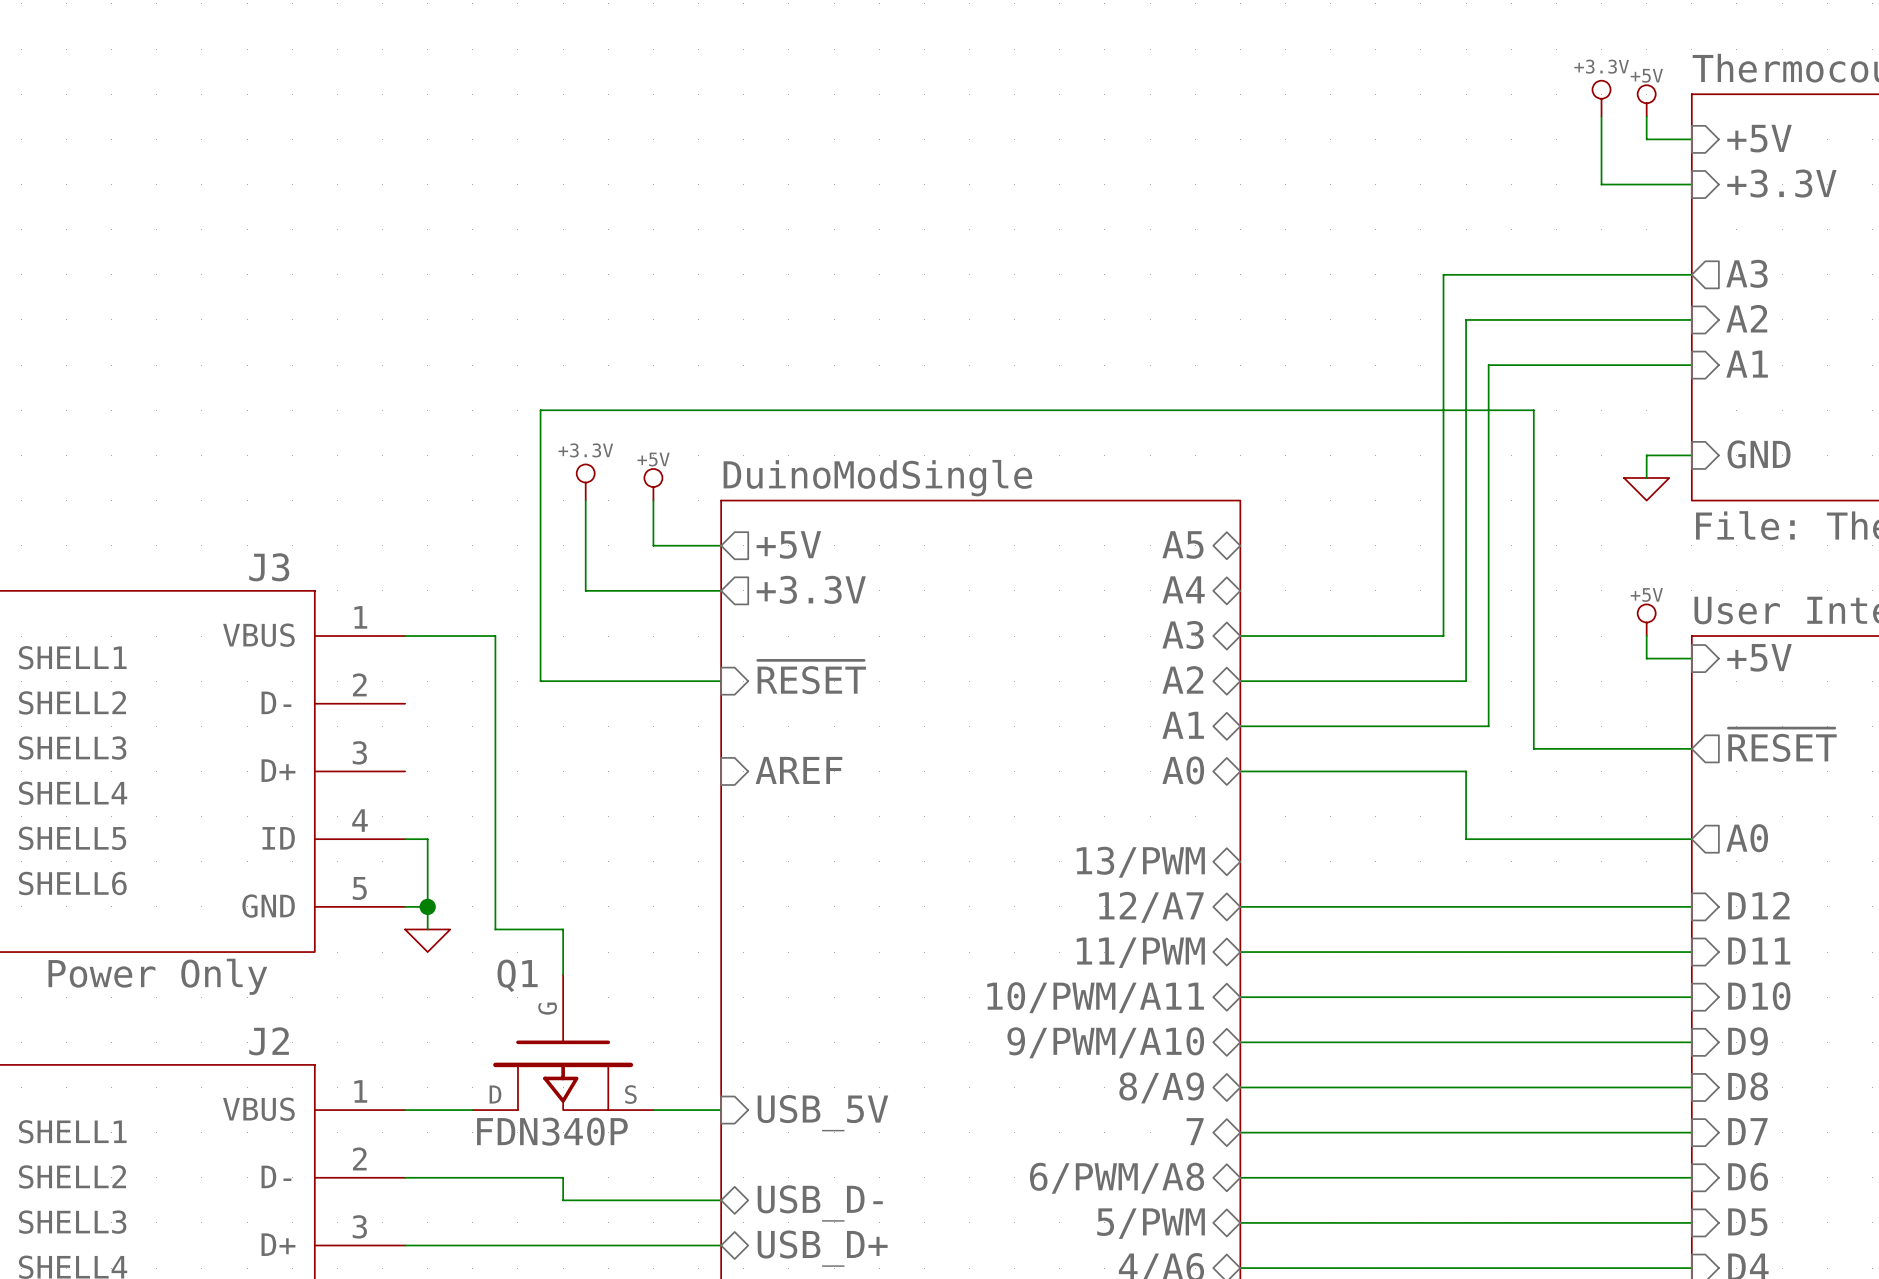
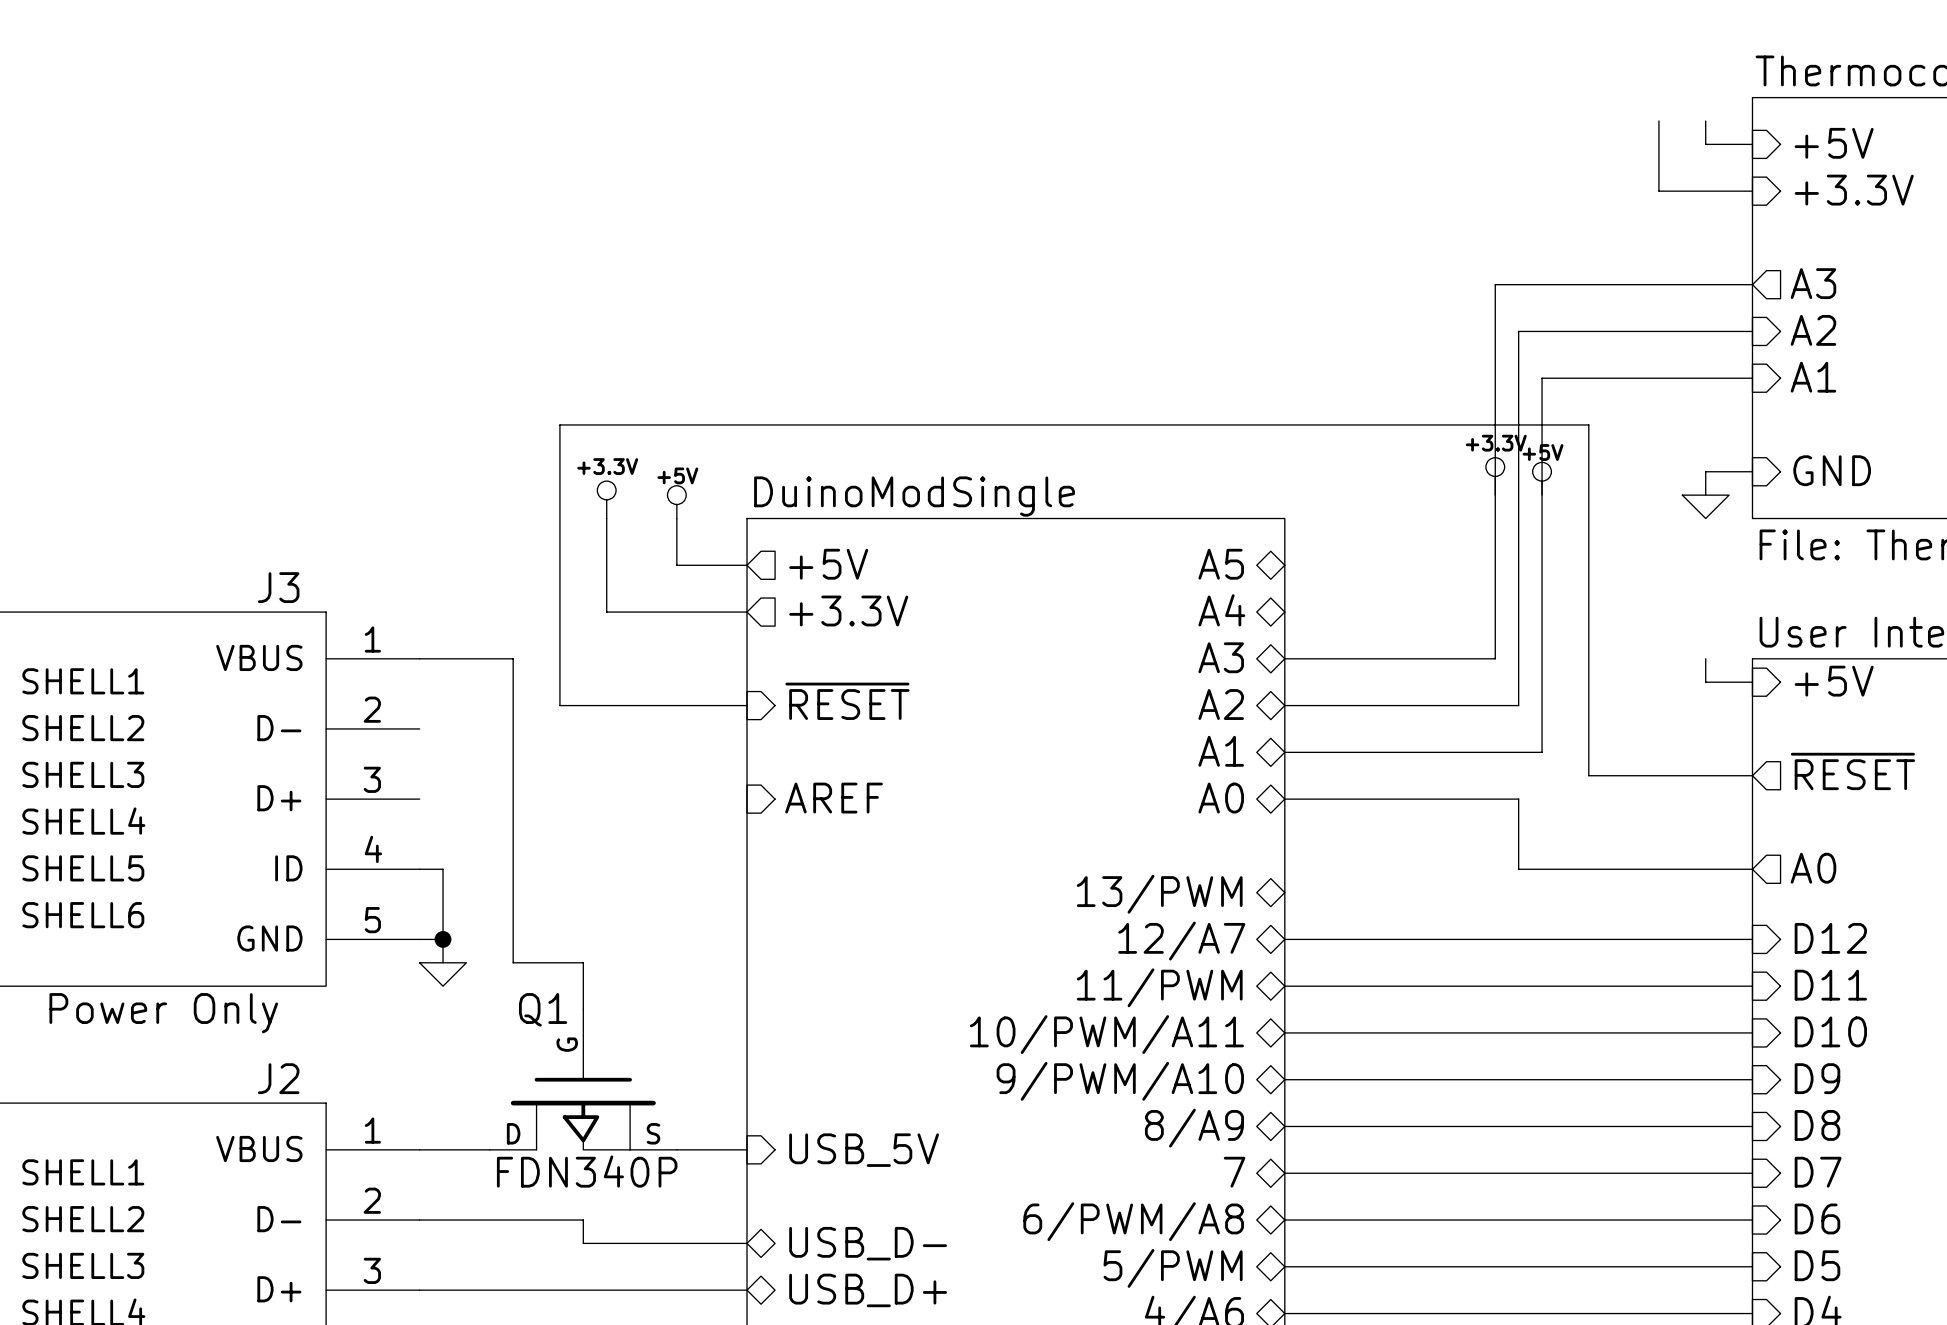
power symbol position: +3.3V (1601, 98) -> +3.3V (1495, 476)
power symbol: +5V (1646, 101) -> none
power symbol: none -> +5V (1542, 478)
power symbol: +5V (1646, 620) -> none

